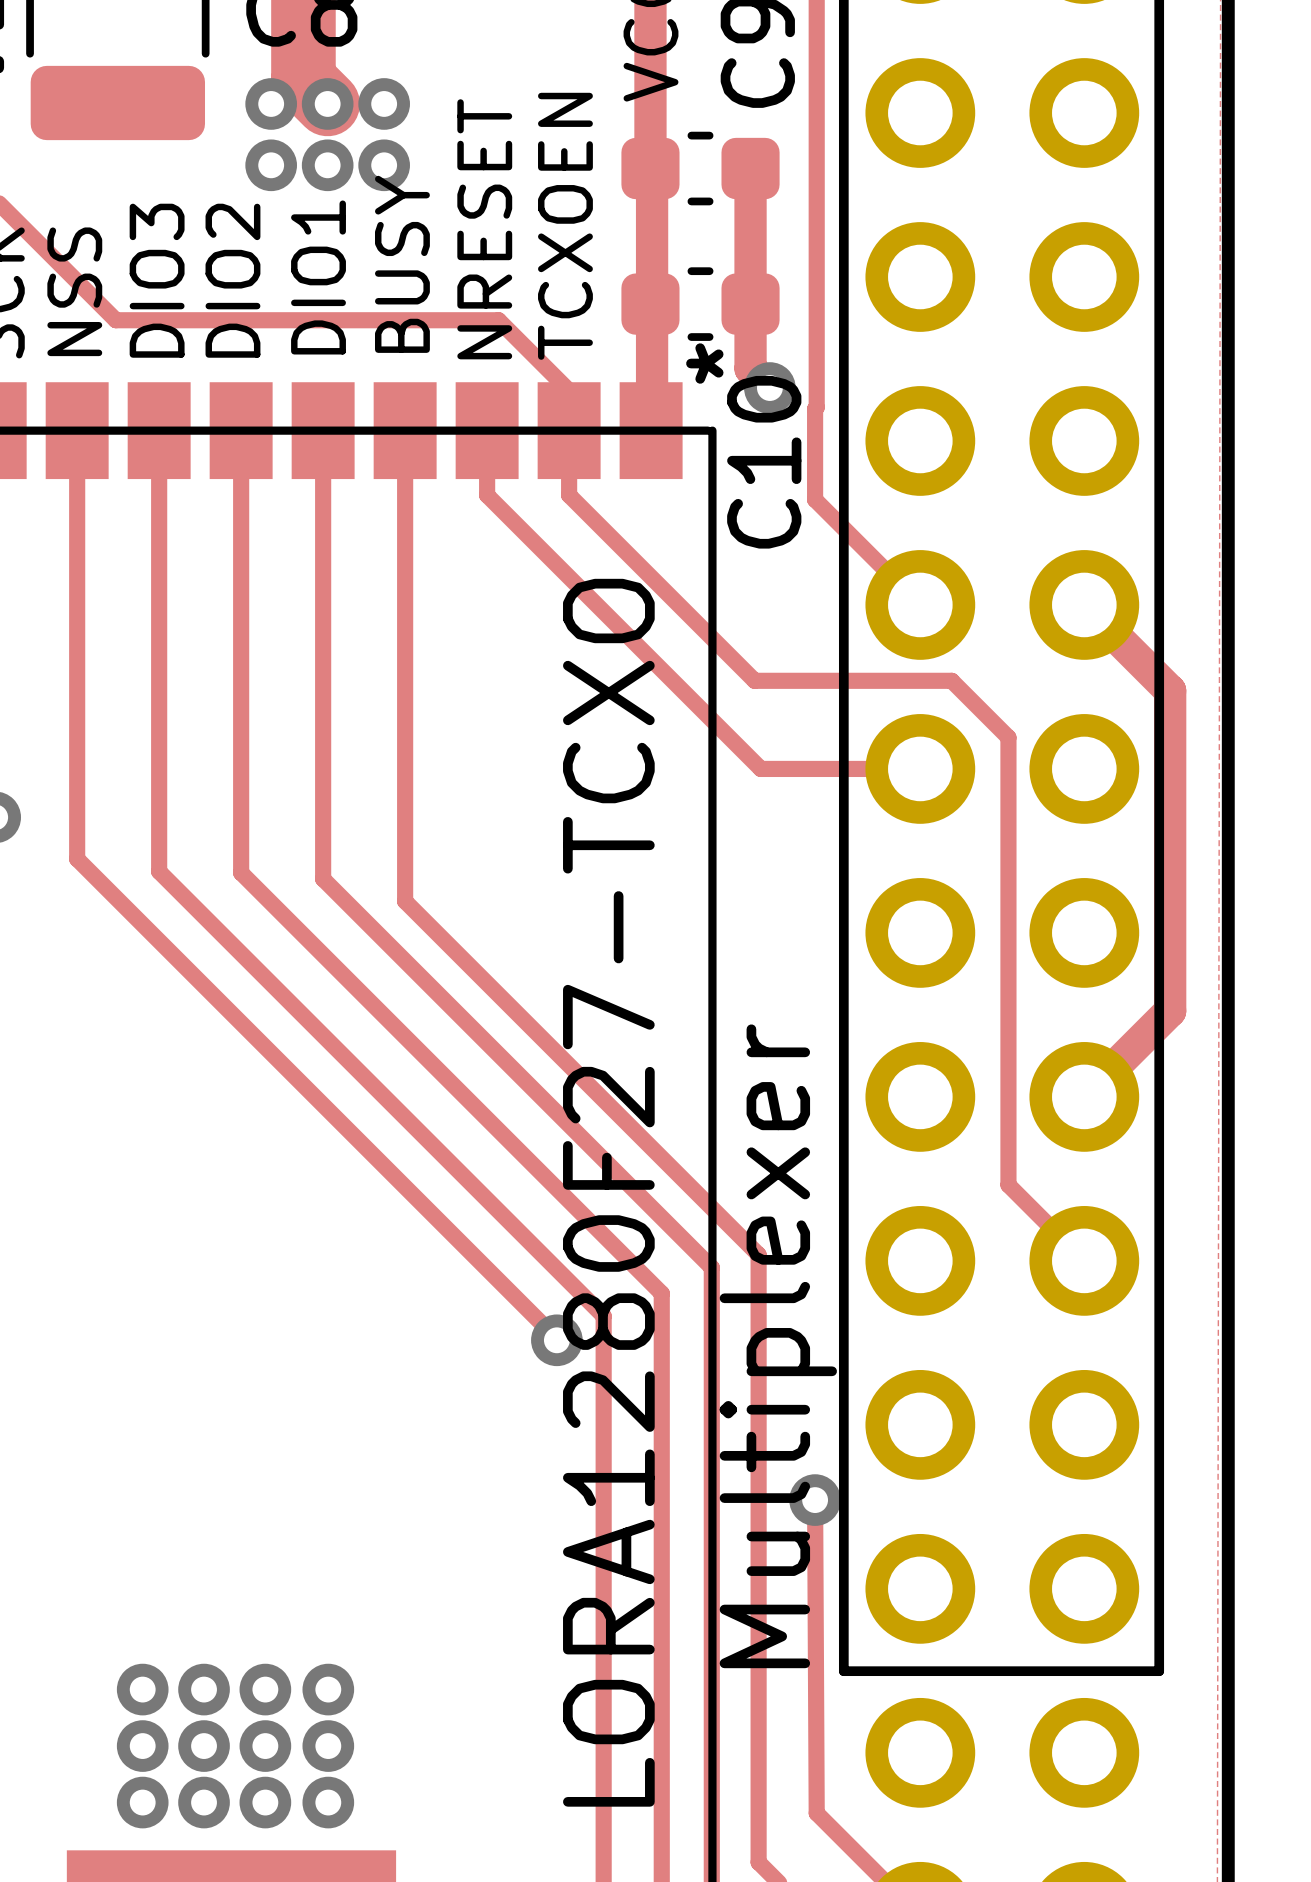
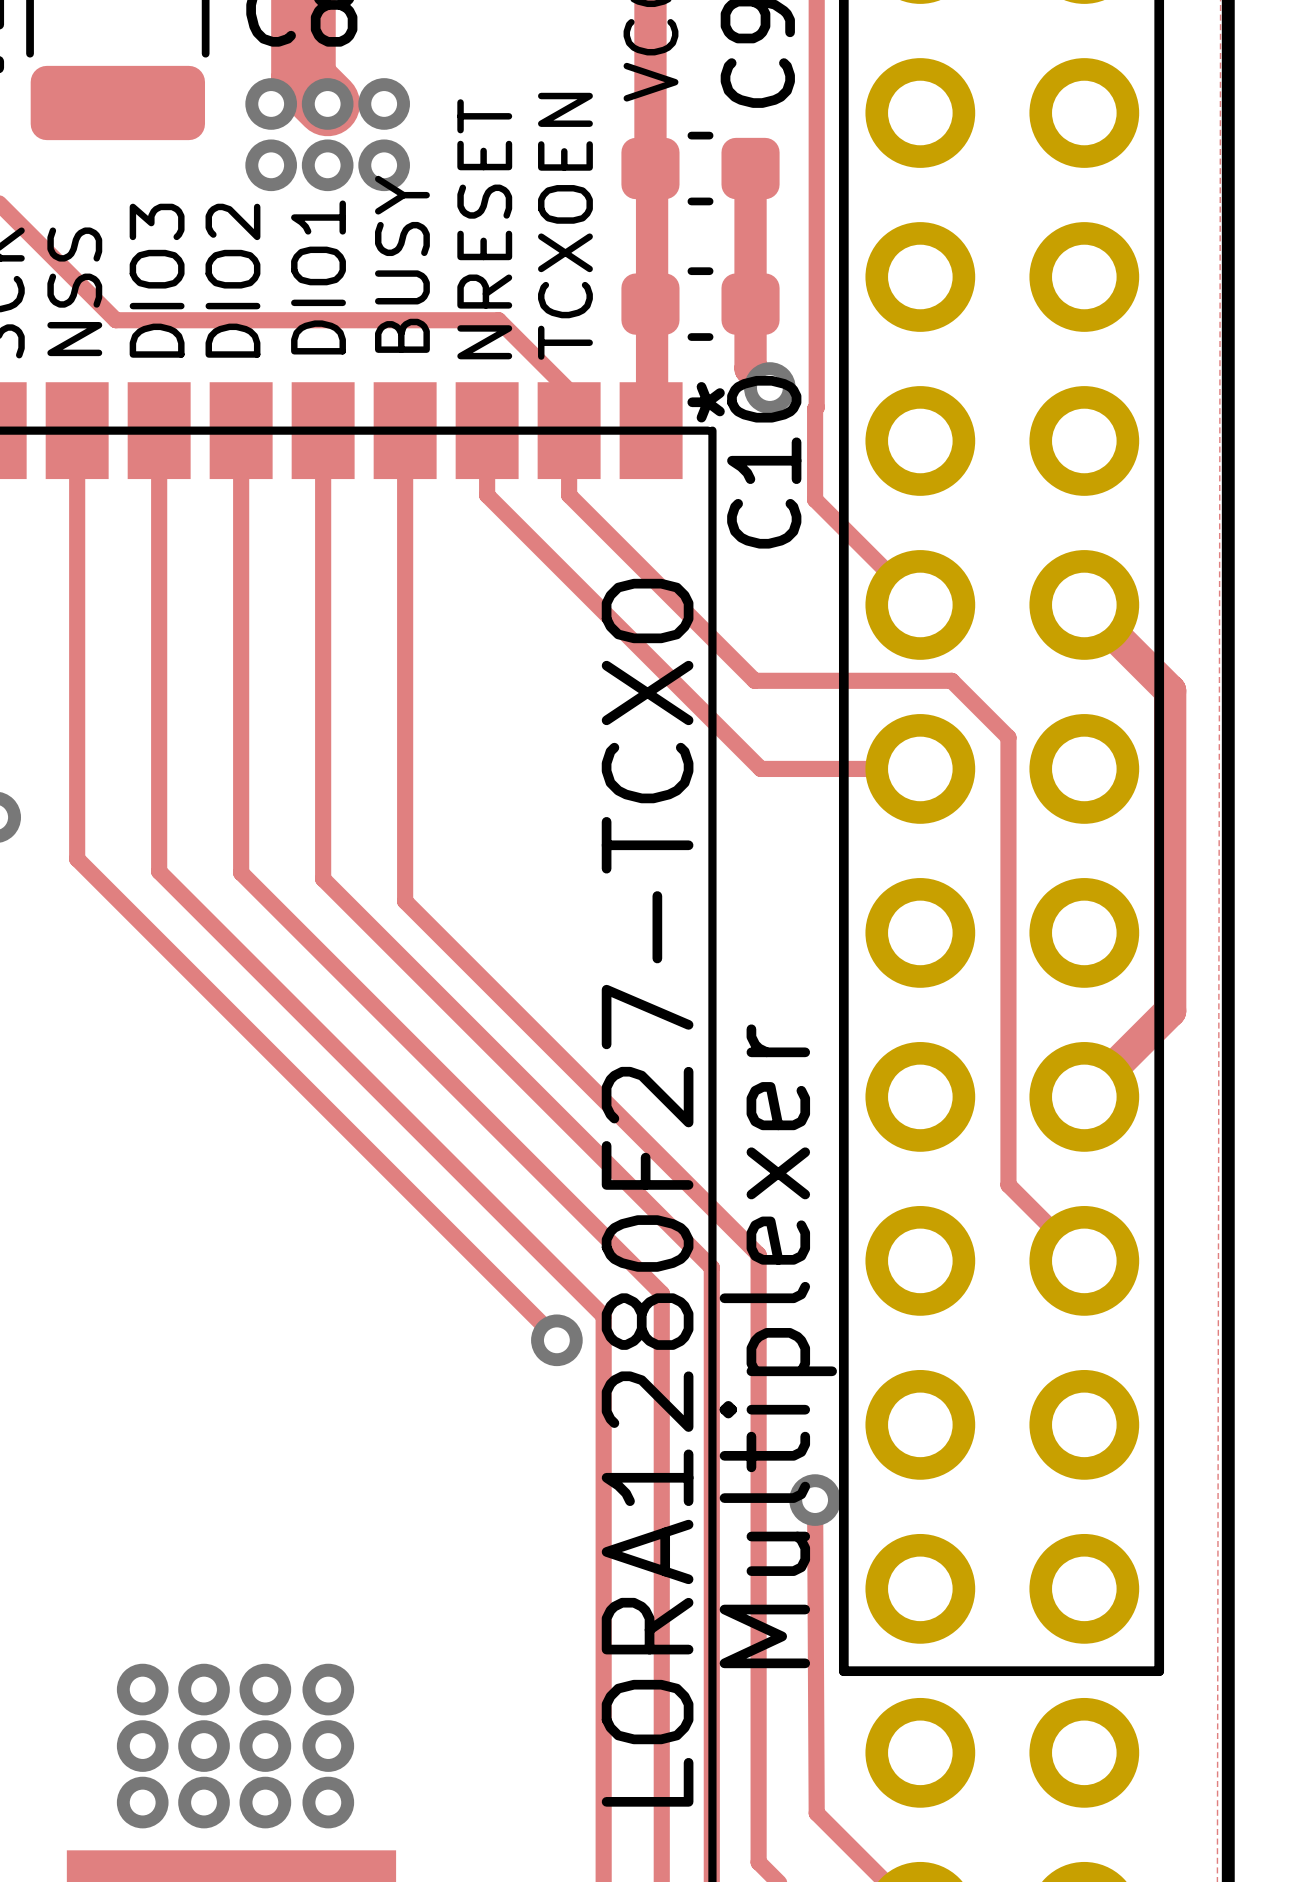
part text position: * (704, 363) -> * (706, 402)
part value position: LORA1280F27-TCXO (608, 1192) -> LORA1280F27-TCXO (647, 1192)

